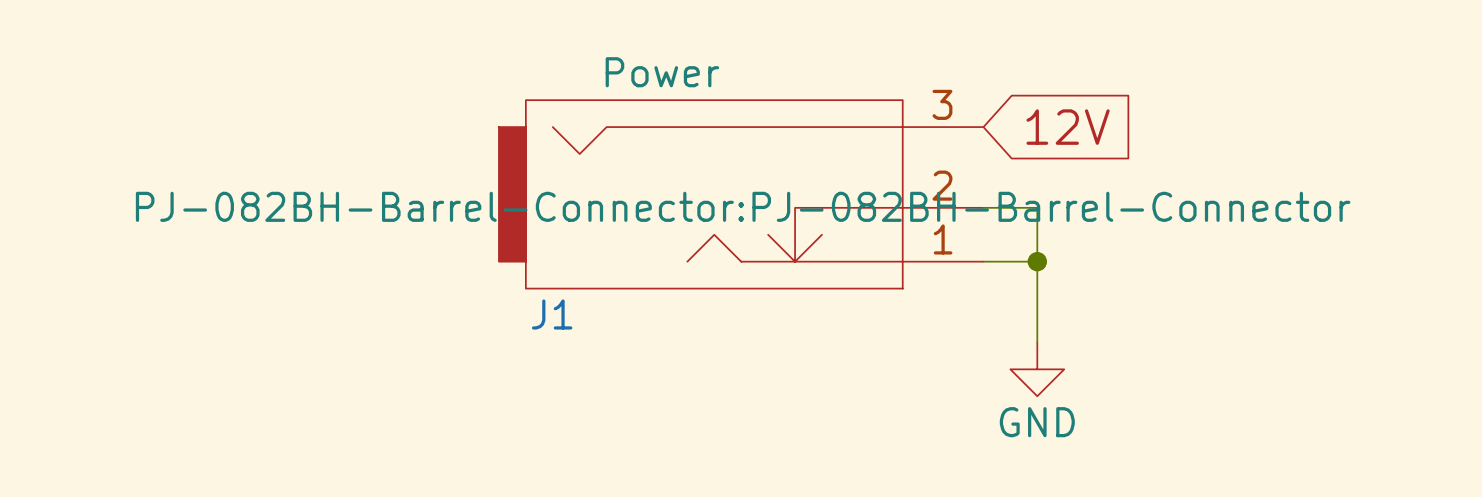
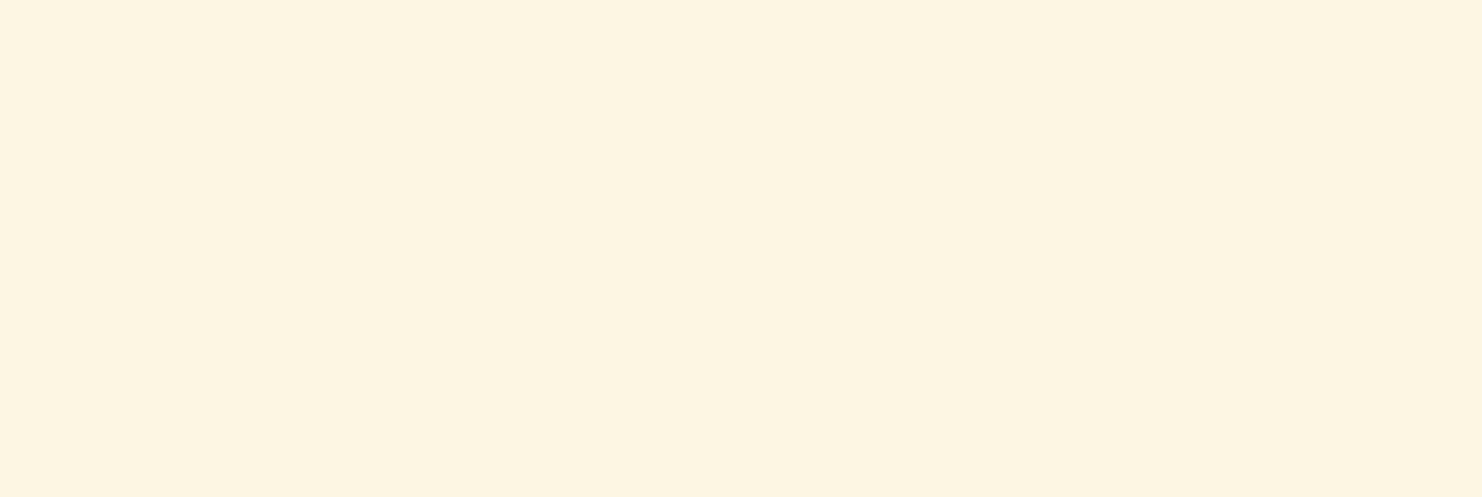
global label: 12V (1068, 127) -> none
J1: Power (741, 194) -> none
wire: (983, 207) (1037, 207) (1037, 342) -> none
wire: (983, 261) (1037, 261) -> none
junction: (1037, 261) -> none
power symbol: GND (1037, 369) -> none

